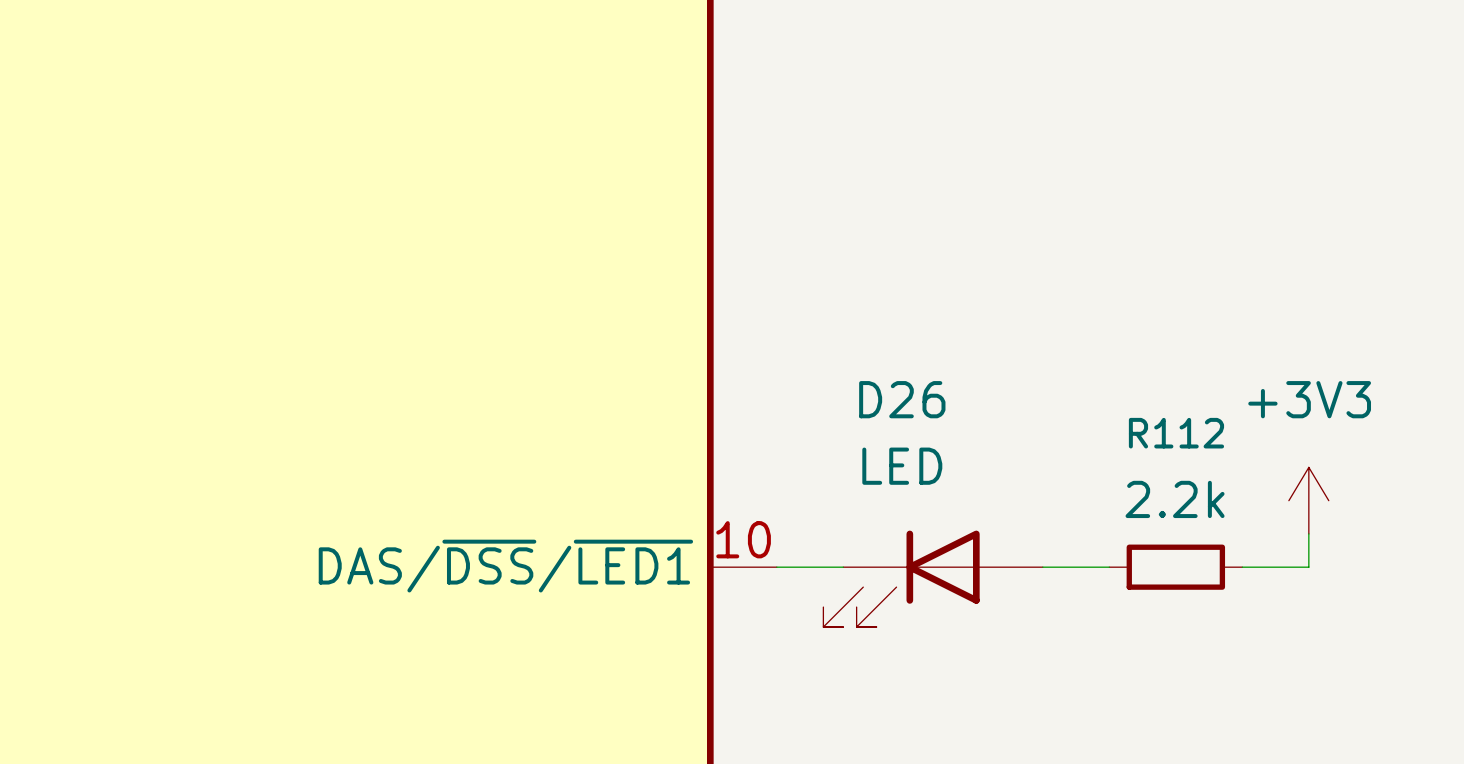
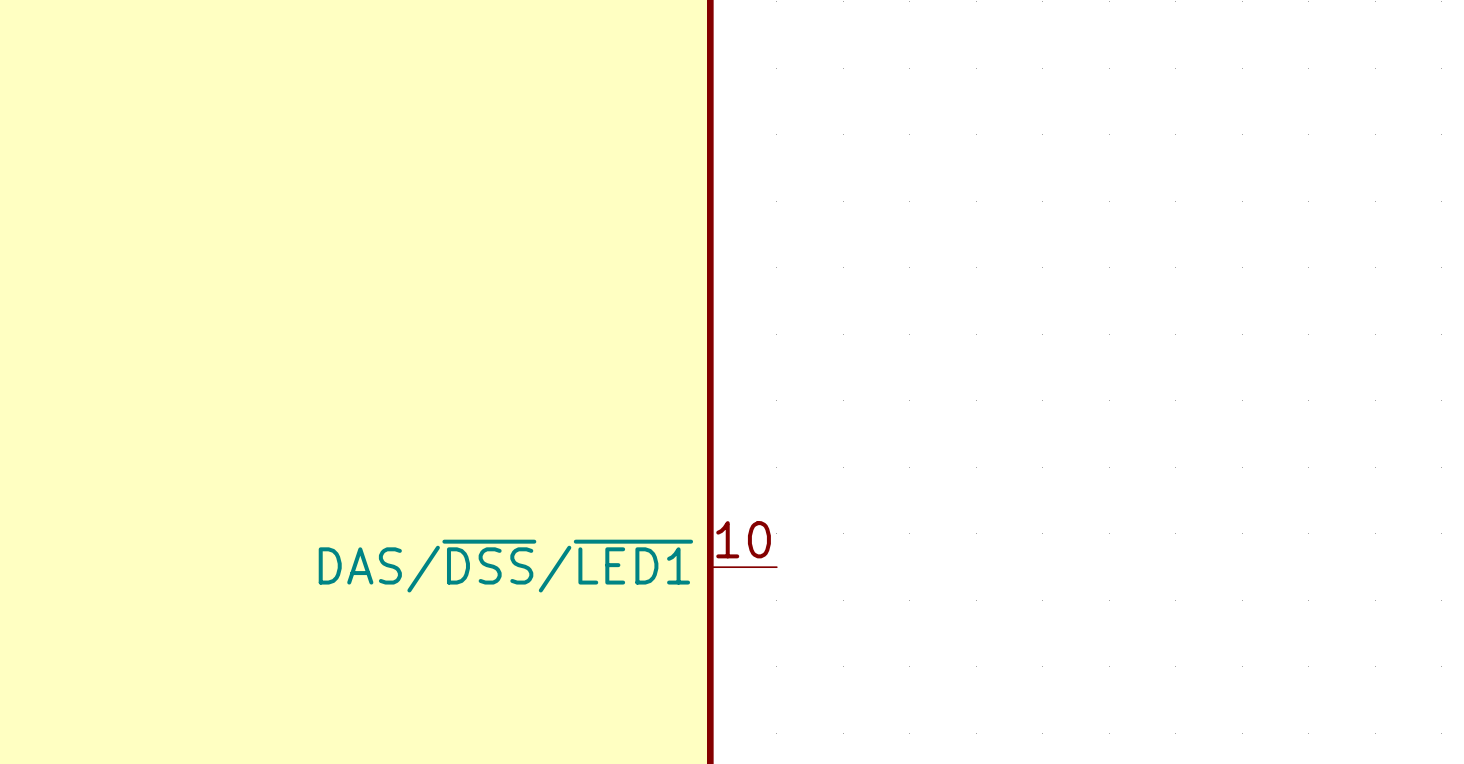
power symbol: +3V3 (1308, 500) -> none
wire: (1308, 533) (1308, 567) (1242, 567) -> none
wire: (776, 567) (843, 567) -> none
wire: (1042, 567) (1109, 567) -> none
R112: 2.2k (1175, 567) -> none
D26: LED (933, 578) -> none

